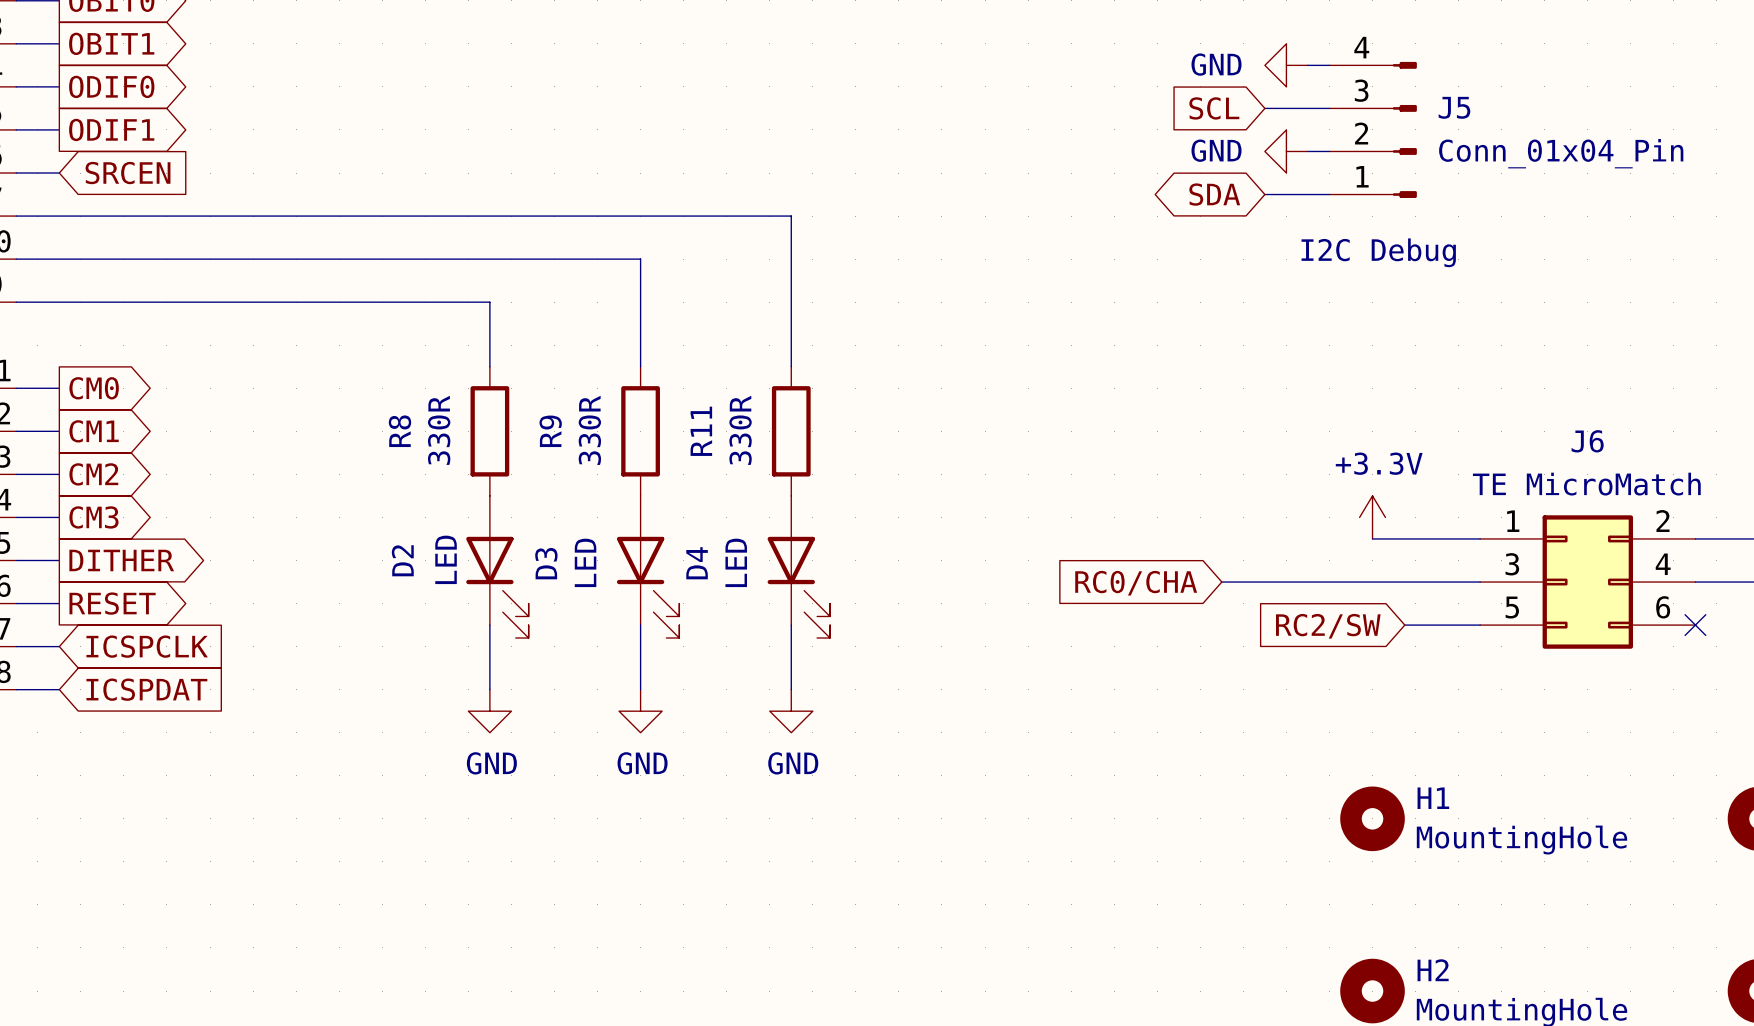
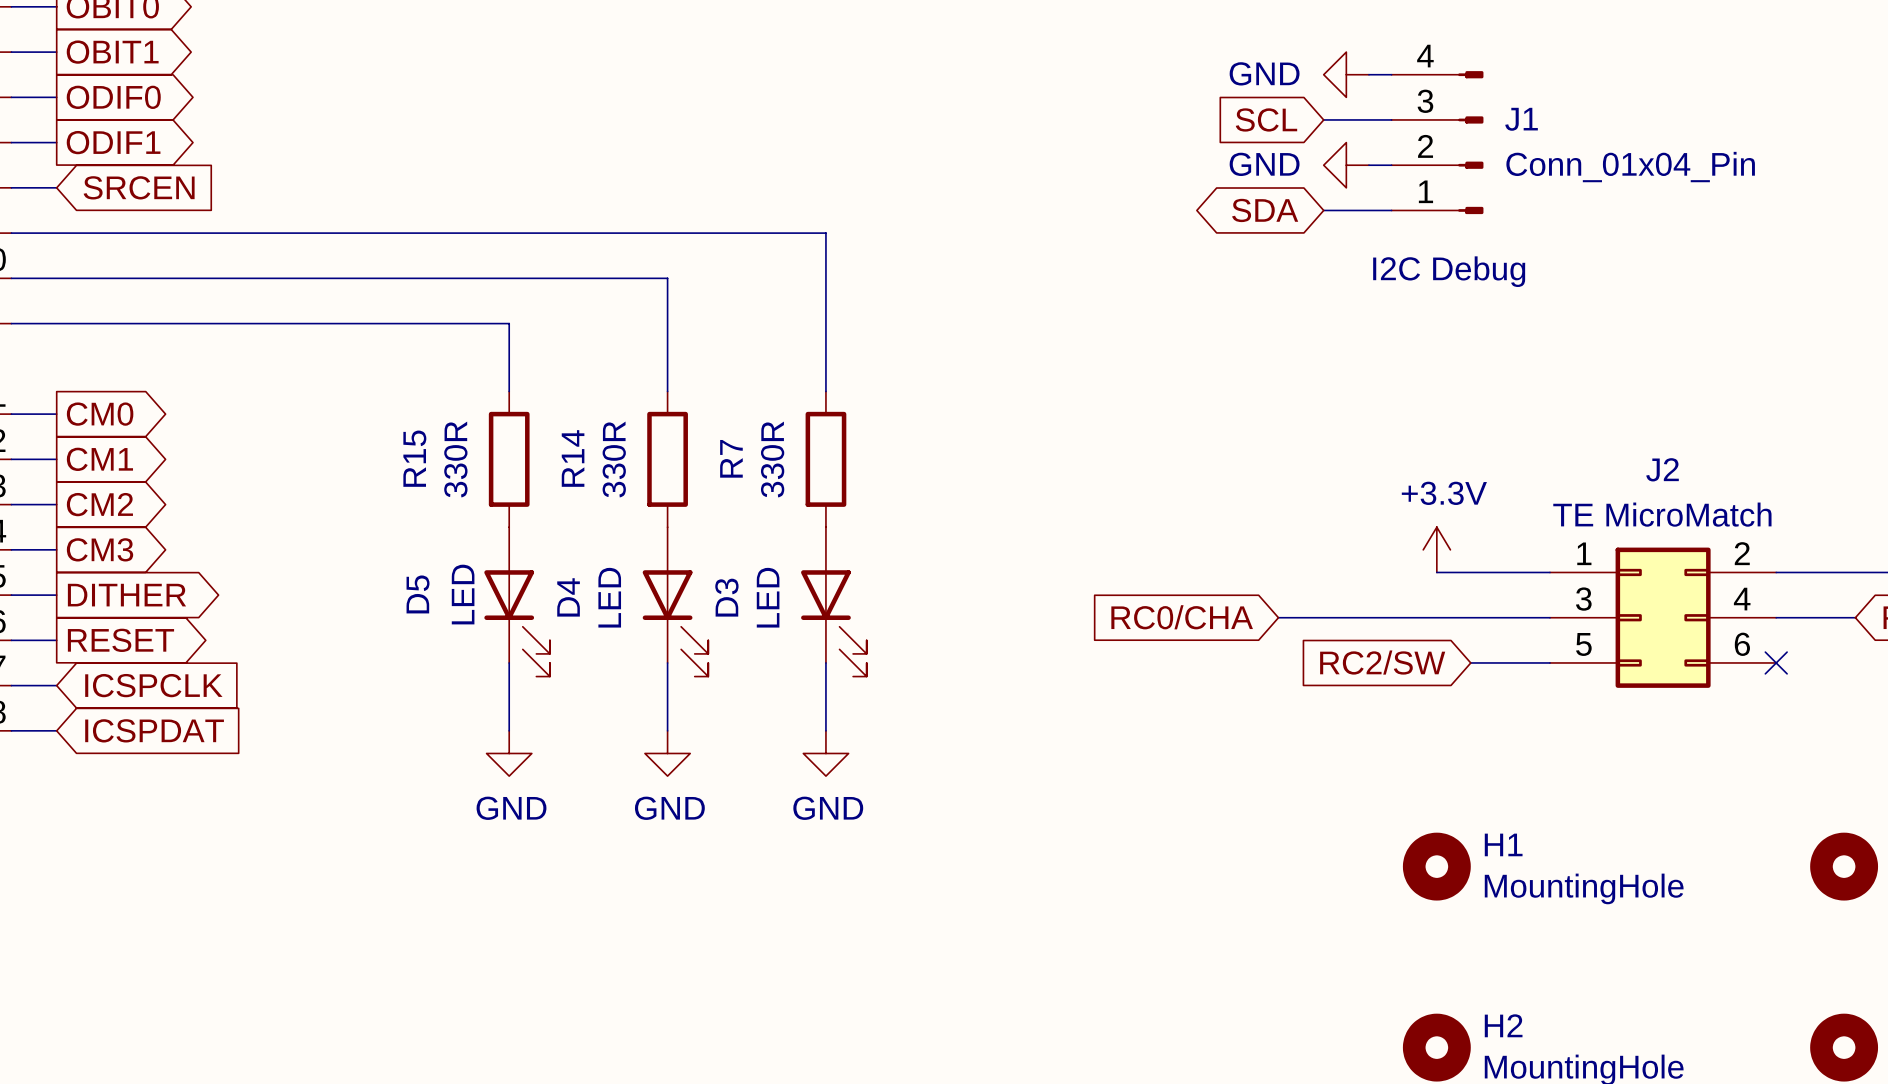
J5 name: J5 (1454, 107) -> J1 (1521, 119)
R8 name: R8 (399, 431) -> R15 (414, 458)
R9 name: R9 (550, 431) -> R14 (573, 458)
R11 name: R11 (701, 431) -> R7 (731, 458)
J6 name: J6 (1587, 441) -> J2 (1662, 469)
D2 name: D2 (402, 560) -> D5 (418, 594)
D3 name: D3 (546, 563) -> D4 (568, 597)
D4 name: D4 (697, 563) -> D3 (726, 597)

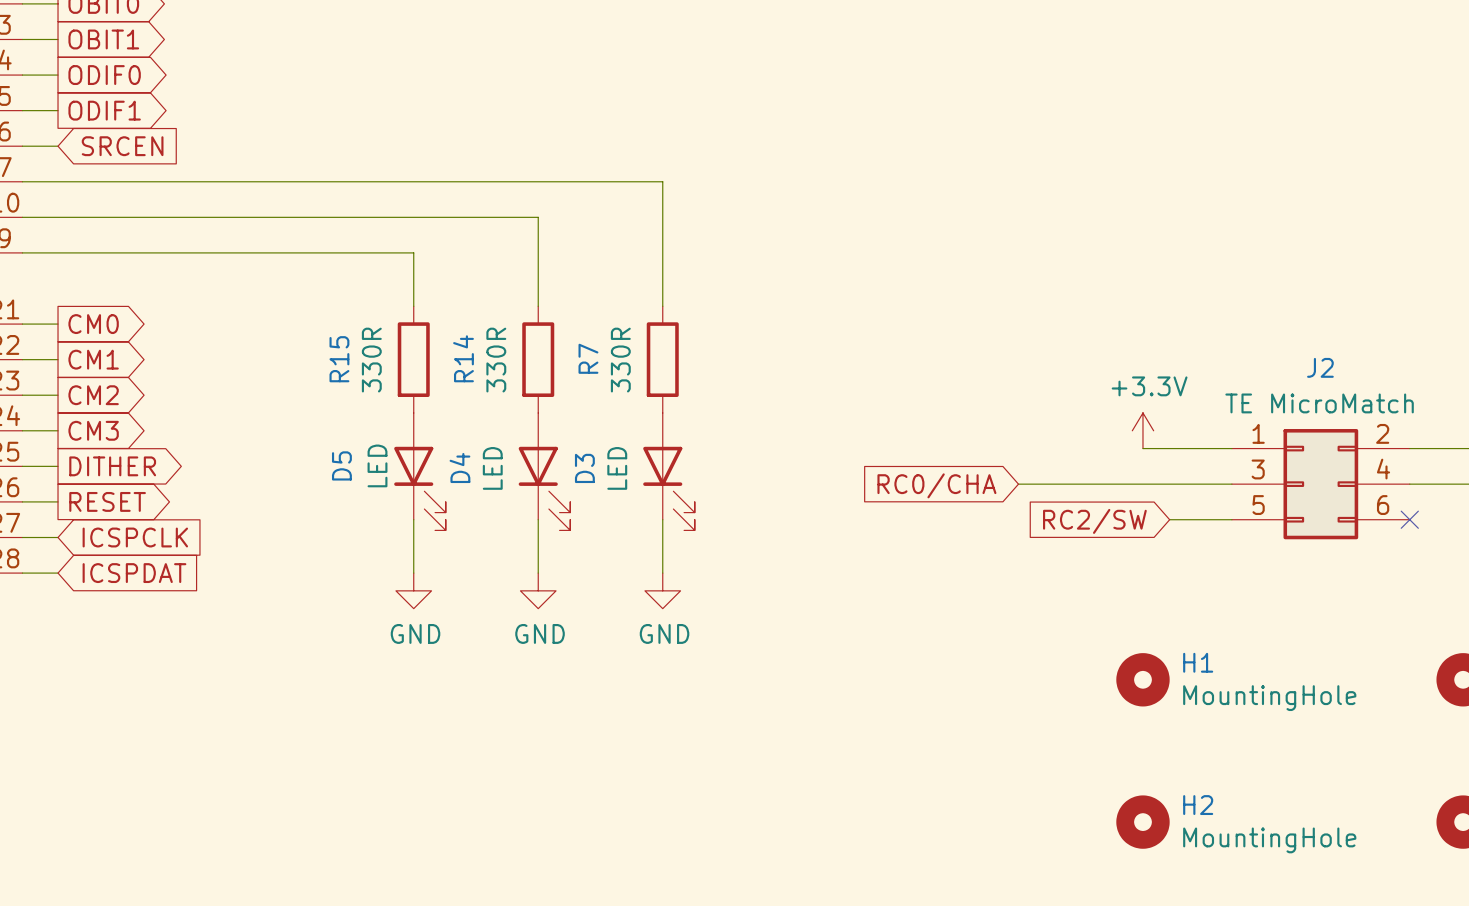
power symbol: GND (1346, 74) -> none
wire: (1368, 74) (1391, 74) -> none
global label: SCL (1266, 119) -> none
wire: (1323, 119) (1391, 119) -> none
J1: Conn_01x04_Pin (1437, 142) -> none
power symbol: GND (1346, 165) -> none
wire: (1368, 165) (1391, 165) -> none
global label: SDA (1265, 210) -> none
wire: (1323, 210) (1391, 210) -> none
text: I2C Debug (1449, 271) -> none

